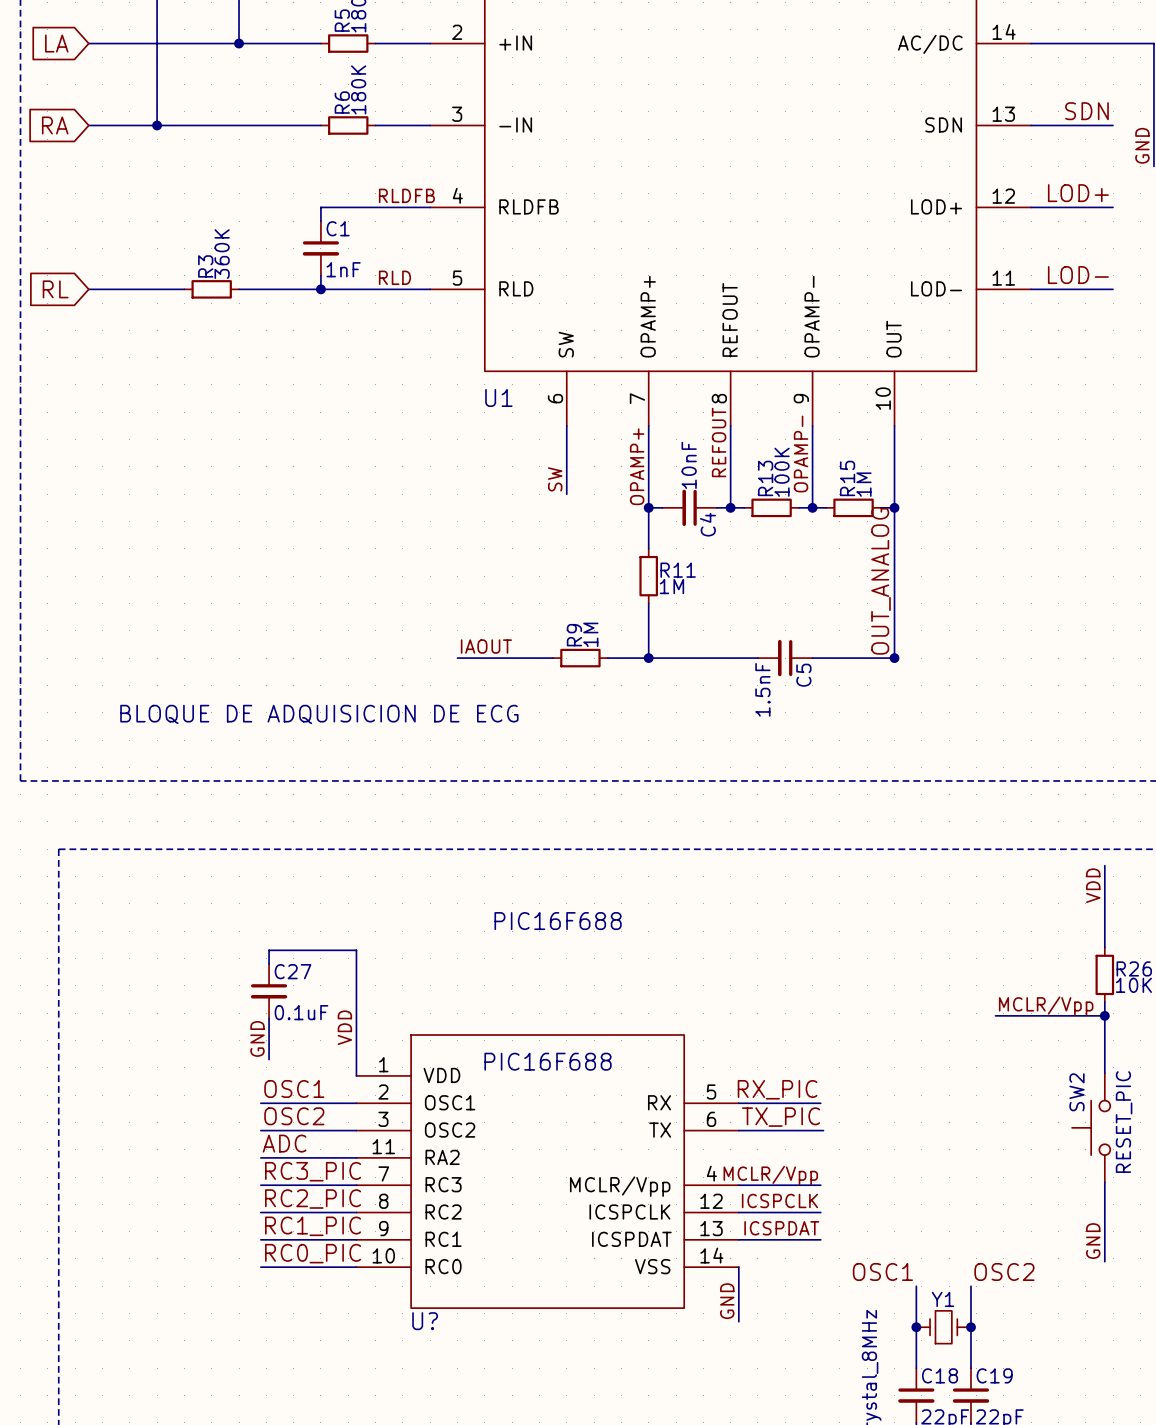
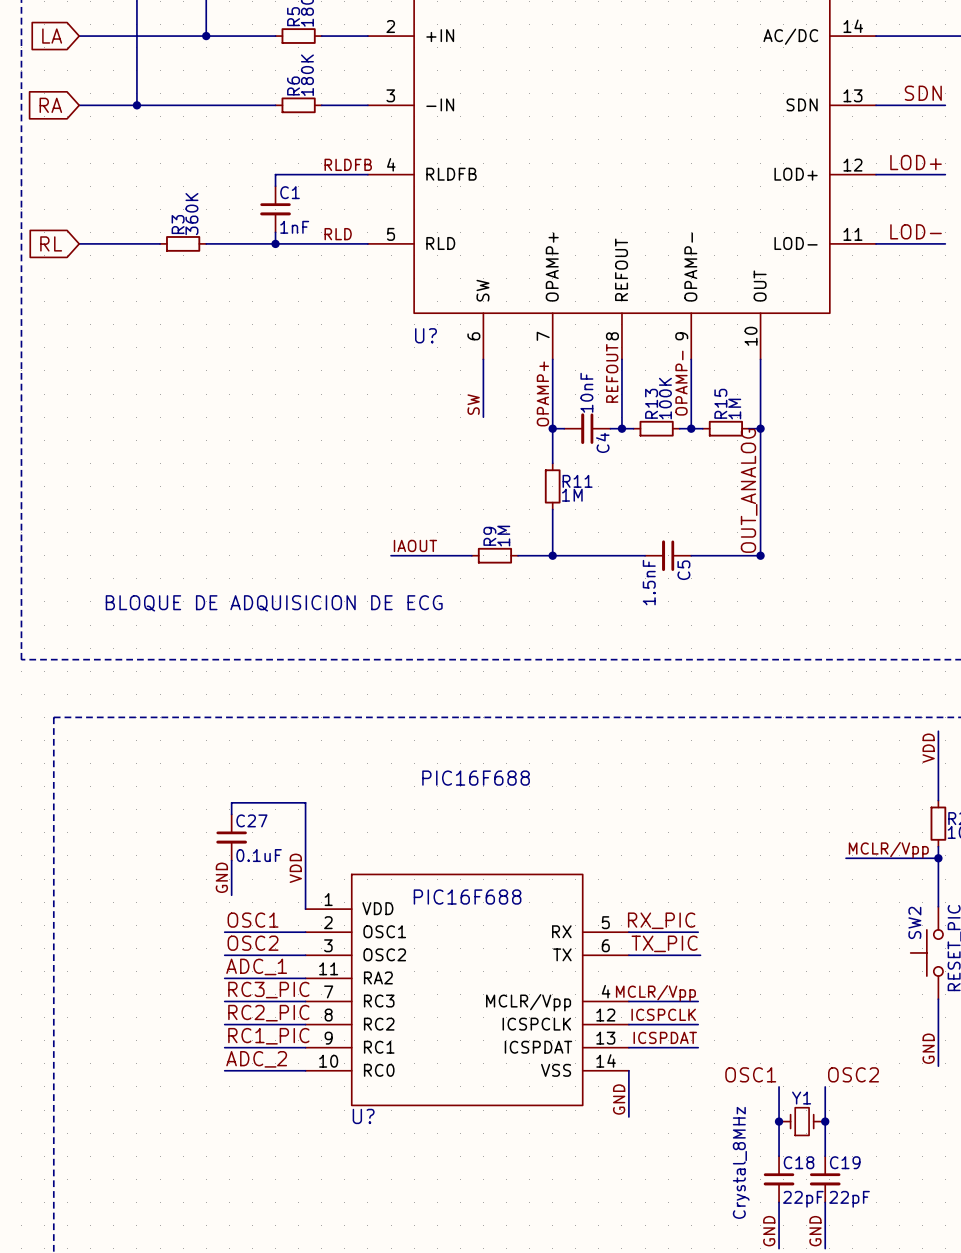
U1 name: U1 (498, 398) -> U? (425, 335)
label: ADC (284, 1143) -> ADC_1 (256, 966)
label: RC0_PIC (313, 1253) -> ADC_2 (256, 1059)

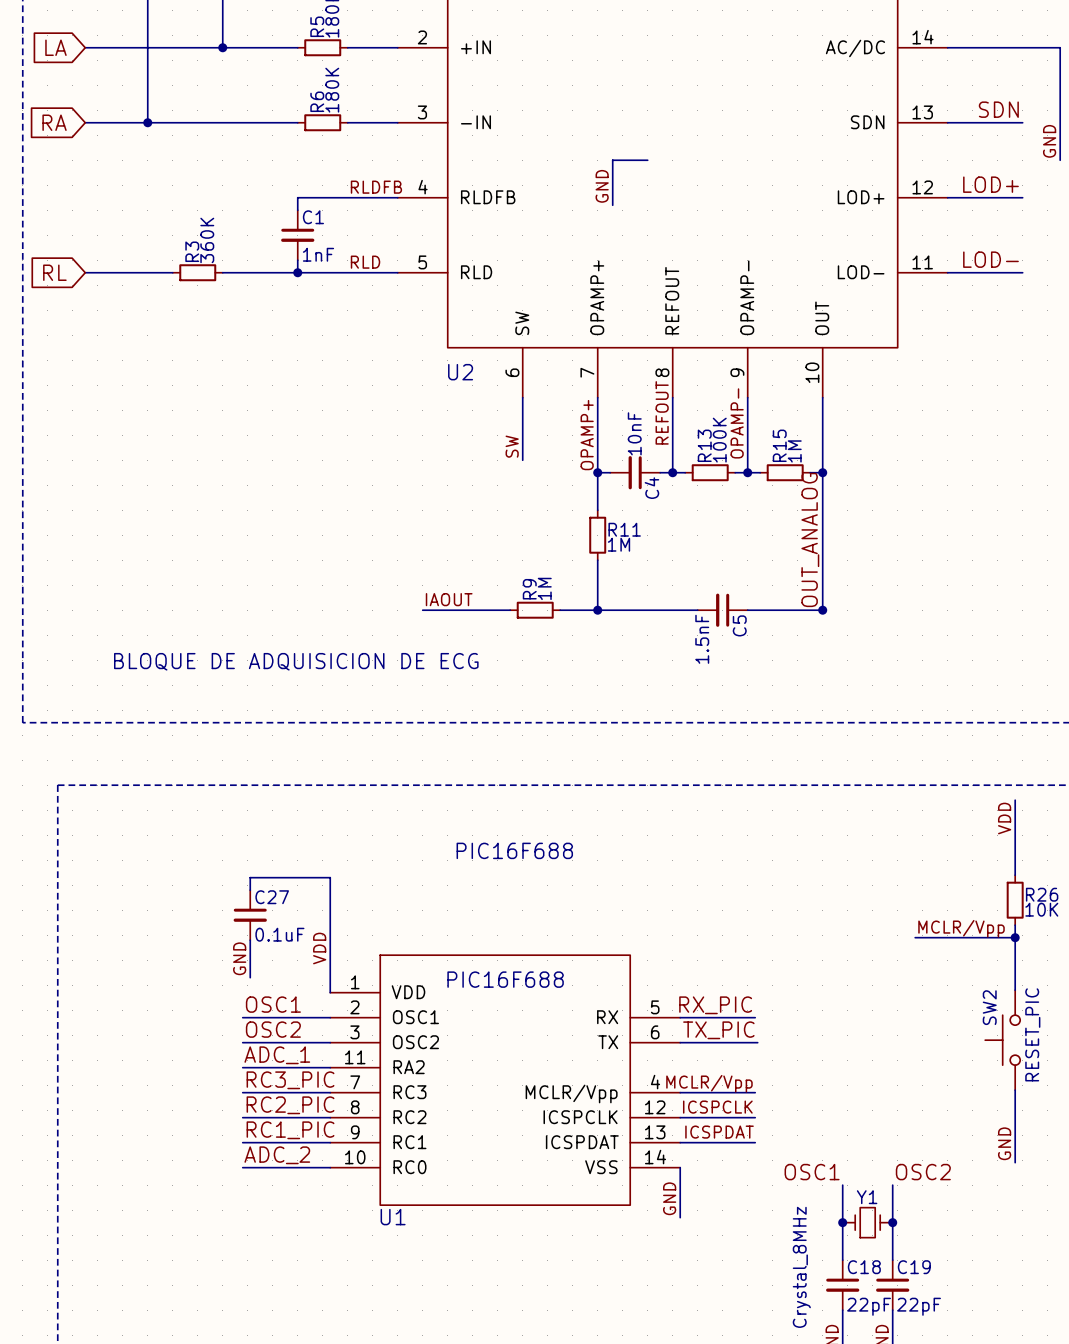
wire: none -> (647, 160) (612, 160) (612, 205)
label: none -> GND (602, 186)
U? name: U? (425, 335) -> U2 (460, 372)
U? name: U? (363, 1116) -> U1 (393, 1217)

